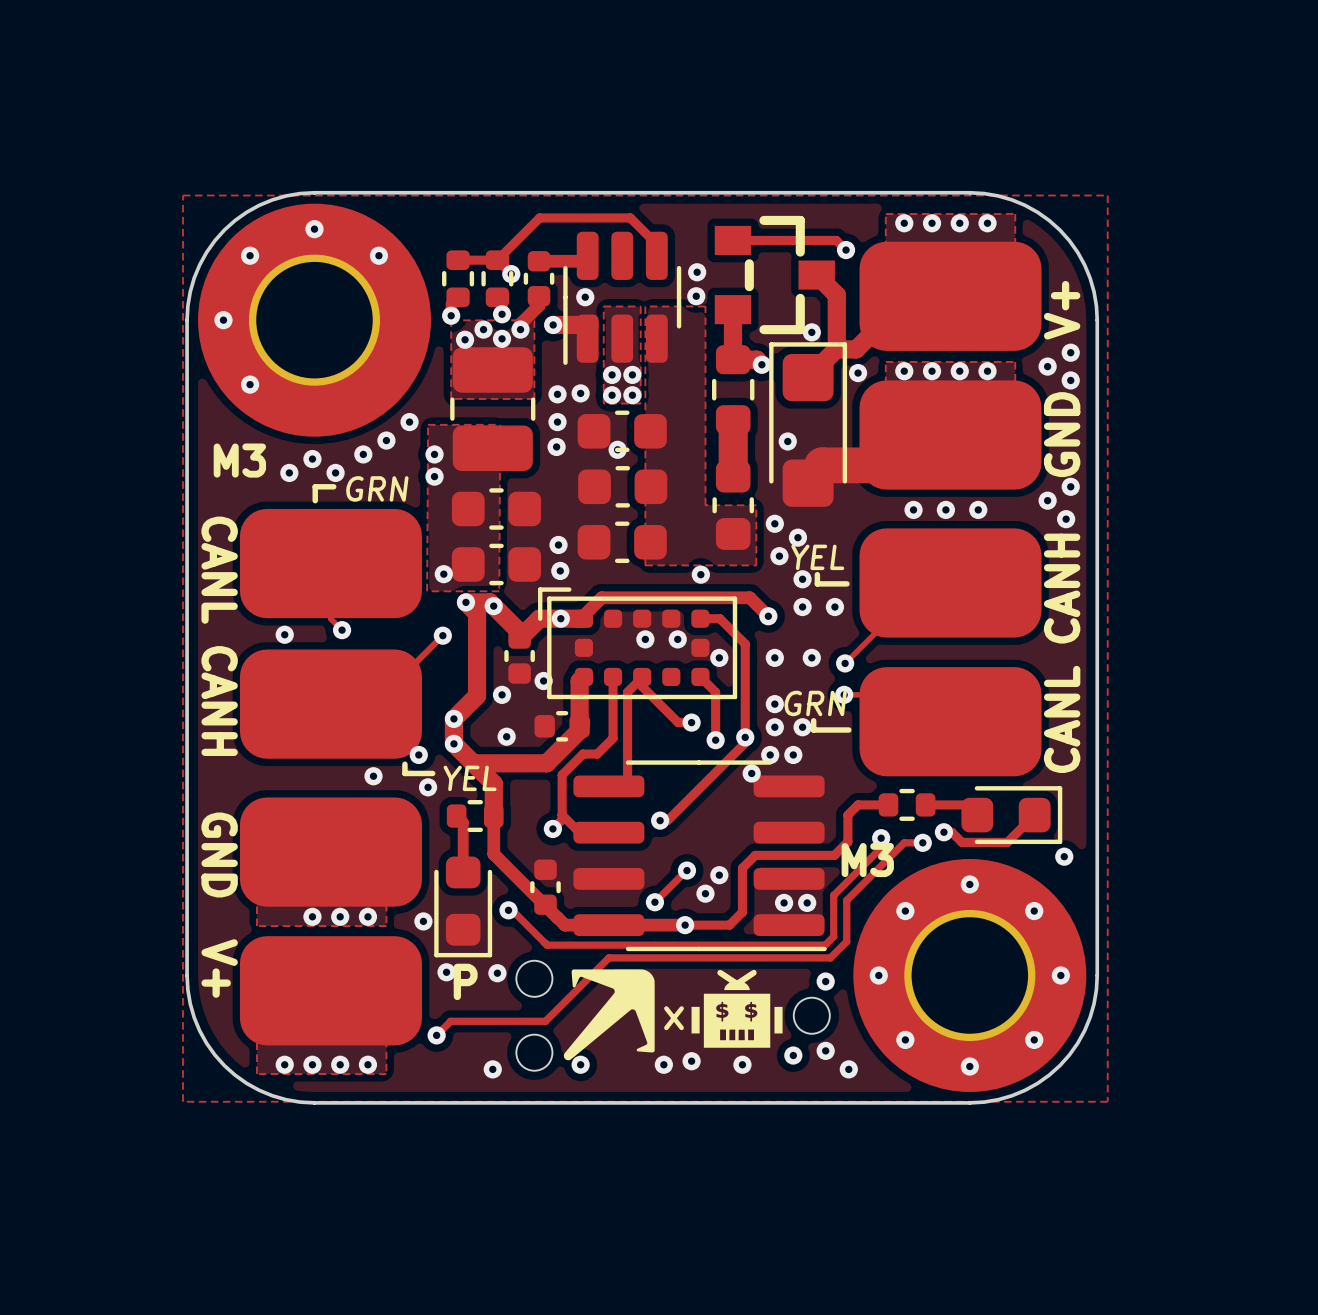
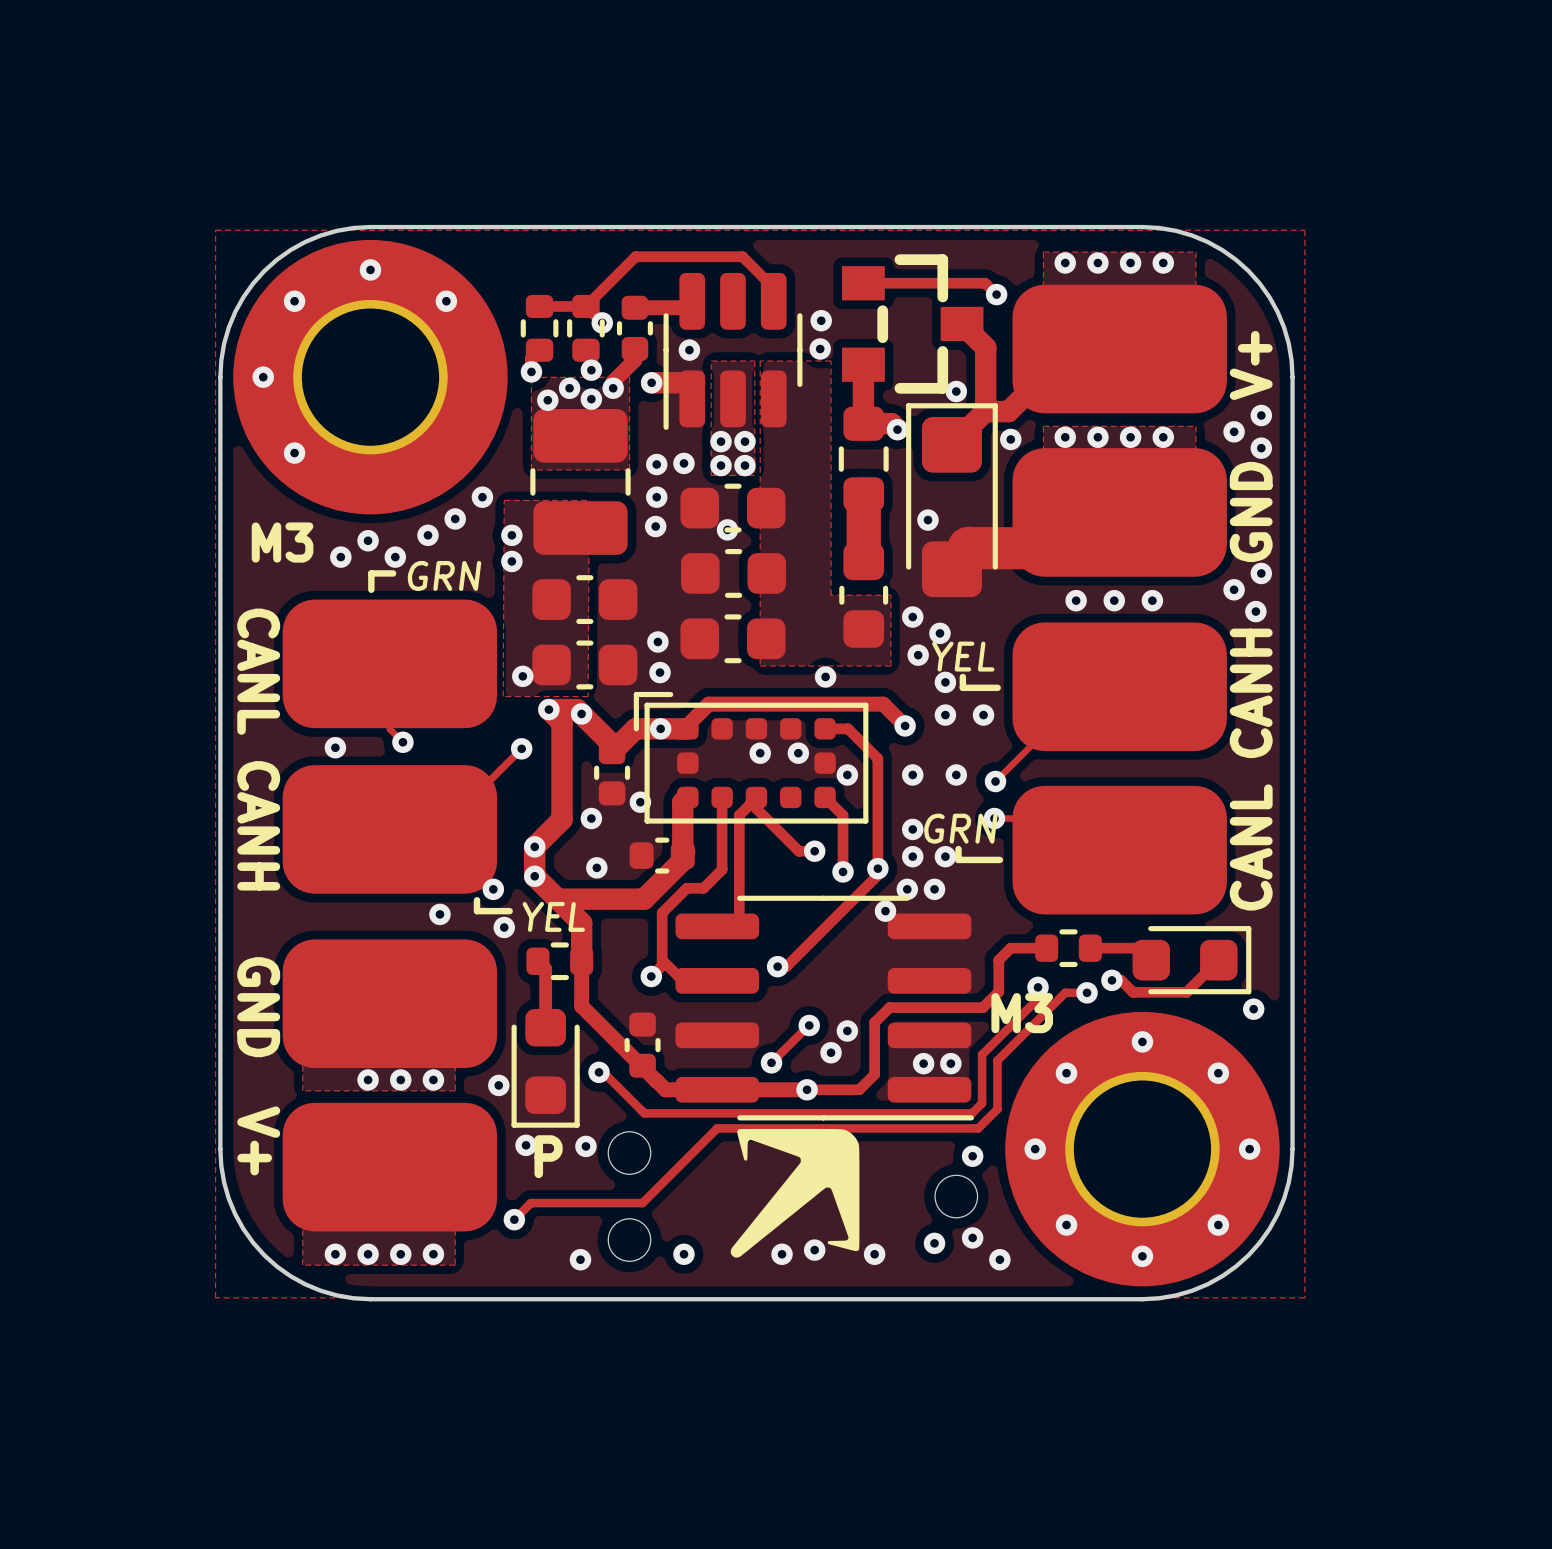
drawing: none -> [730, 1128, 860, 1258]
drawing: [563, 969, 783, 1061] -> none
text: x (674, 1018) -> none

